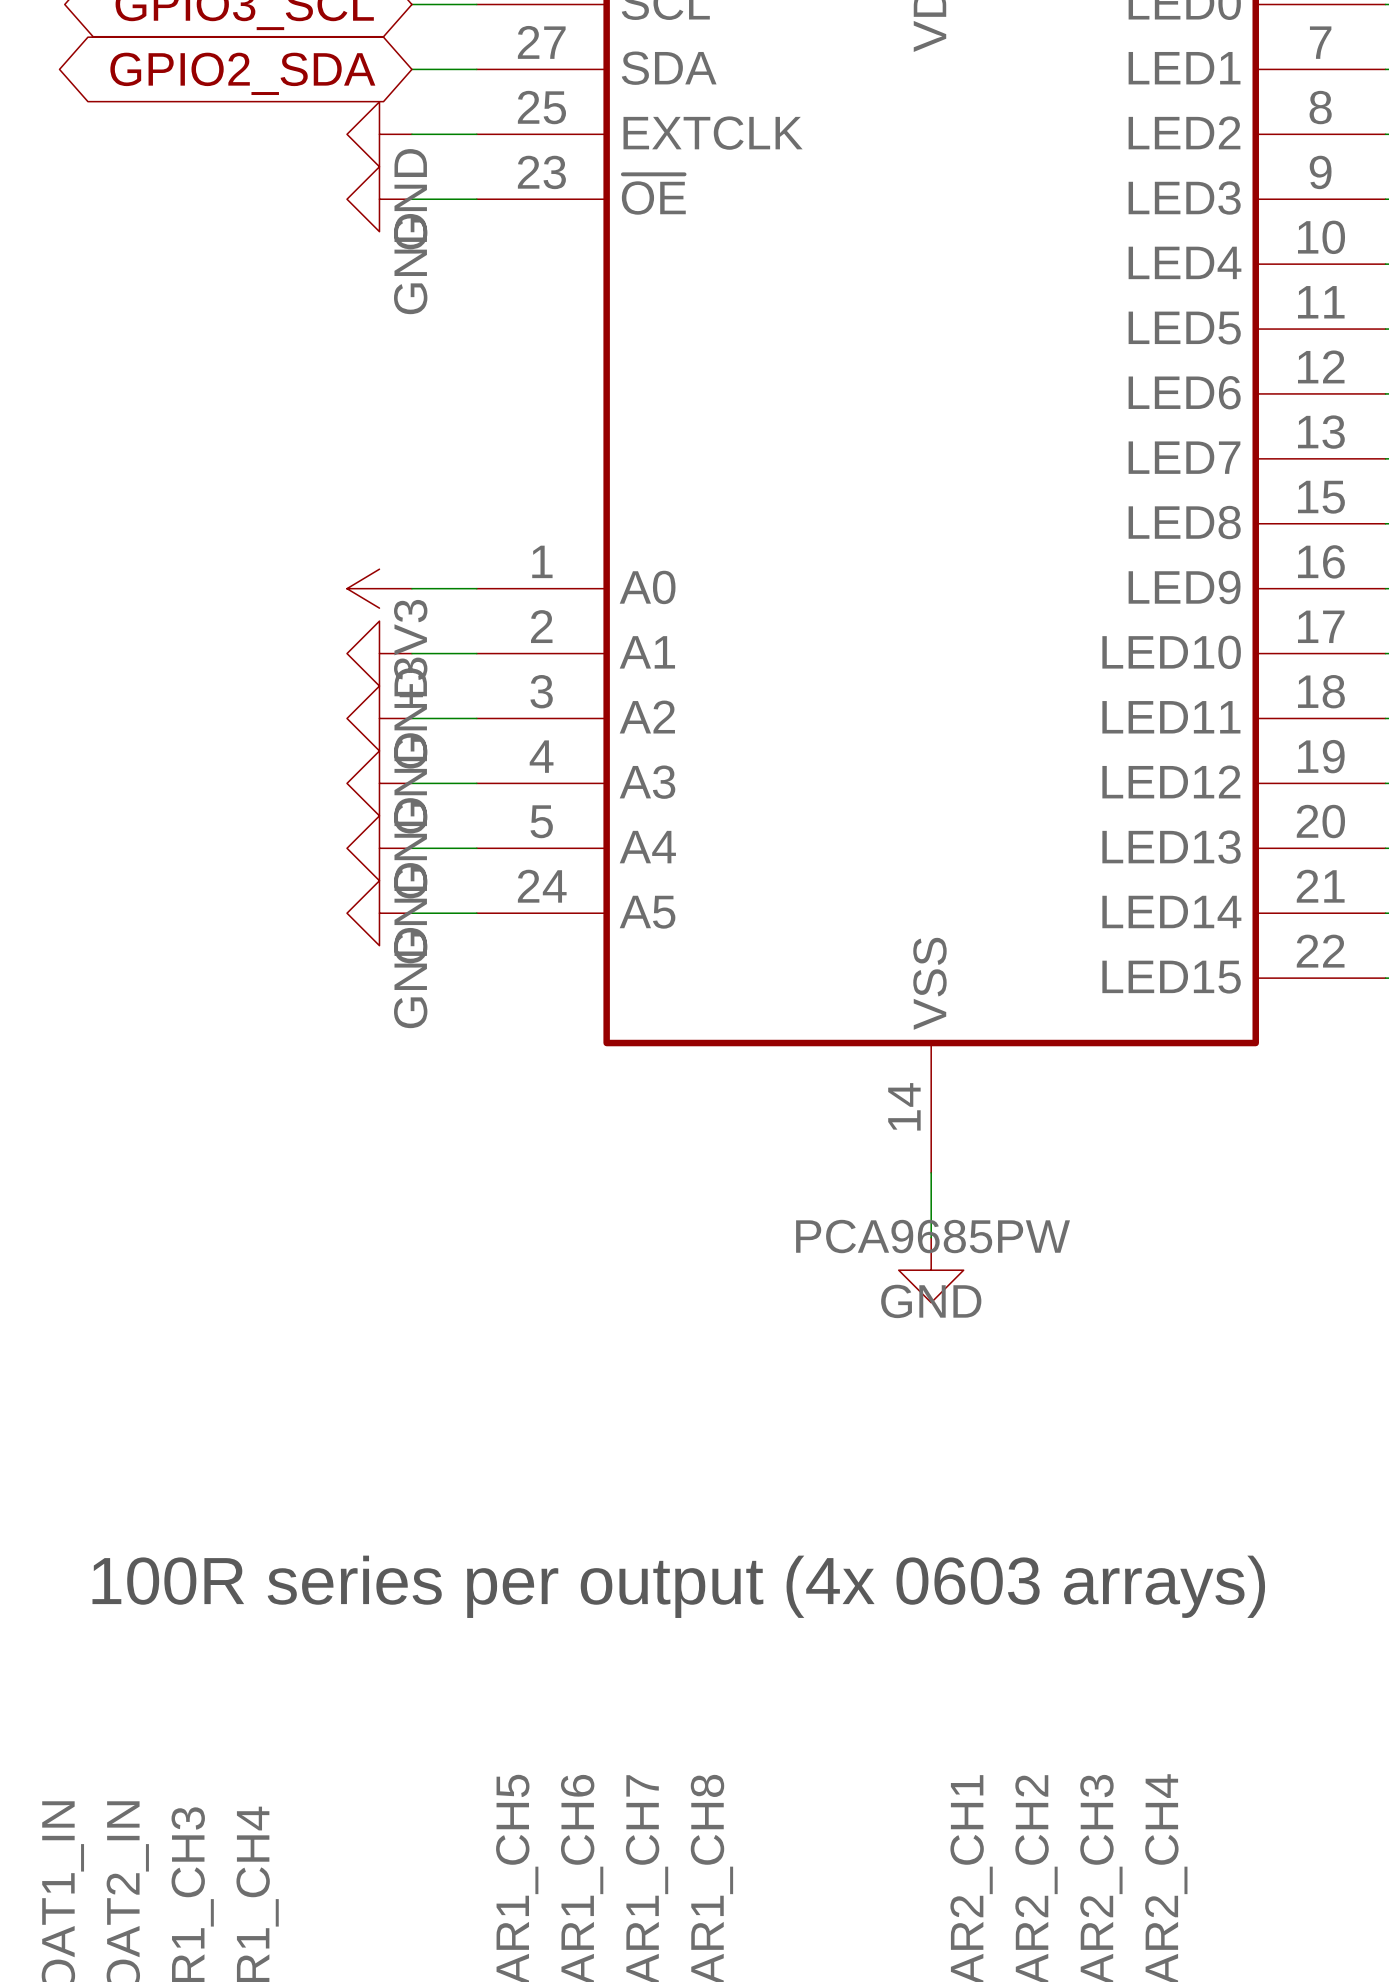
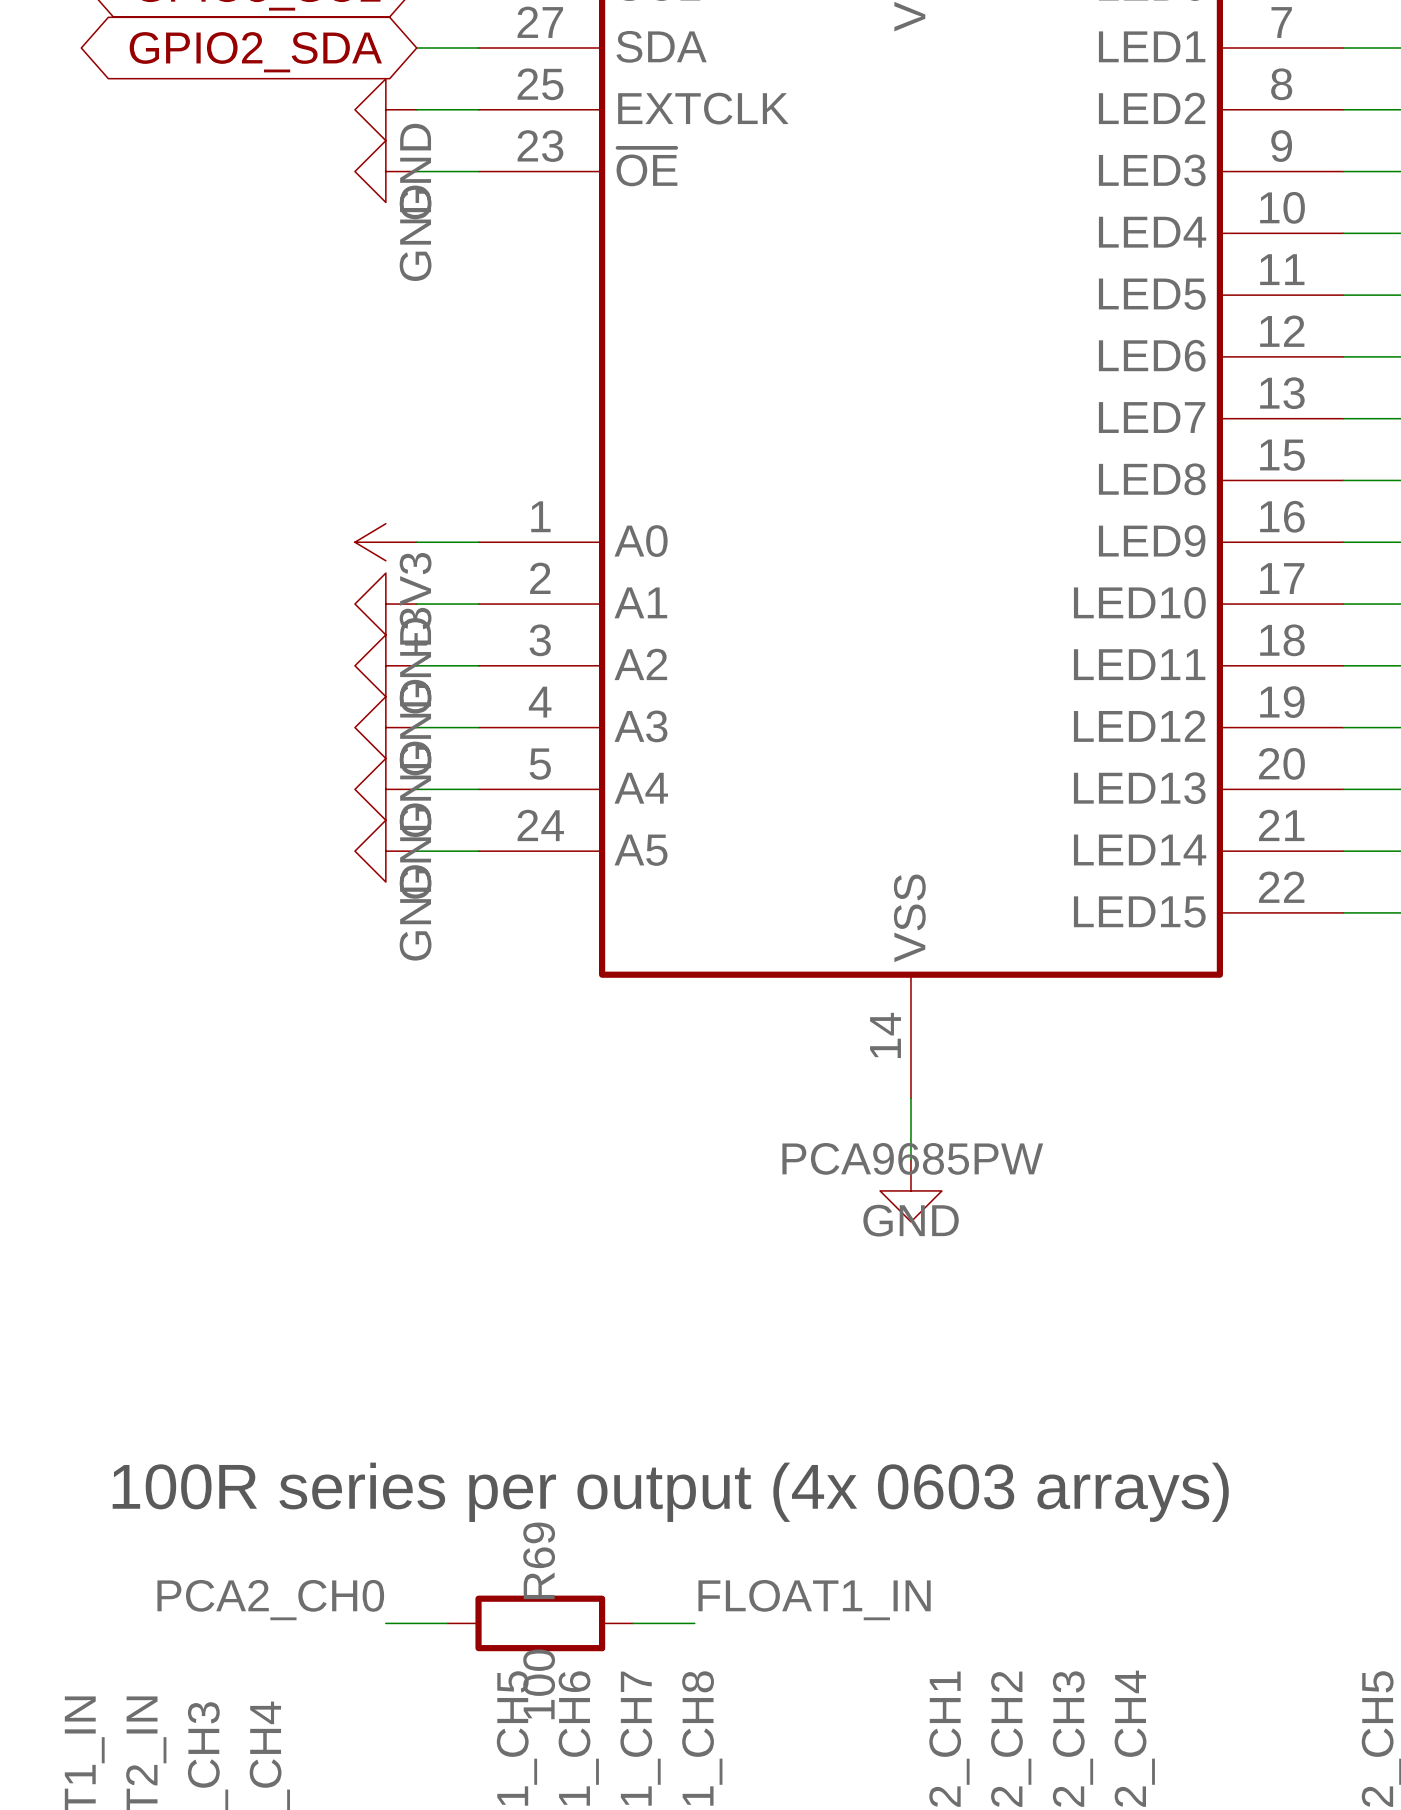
label: none -> PCA2_CH0 (270, 1600)
label: none -> FLOAT1_IN (814, 1600)
wire: none -> (385, 1623) (447, 1623)
R69: none -> 100 (540, 1623)
wire: none -> (632, 1623) (694, 1623)

